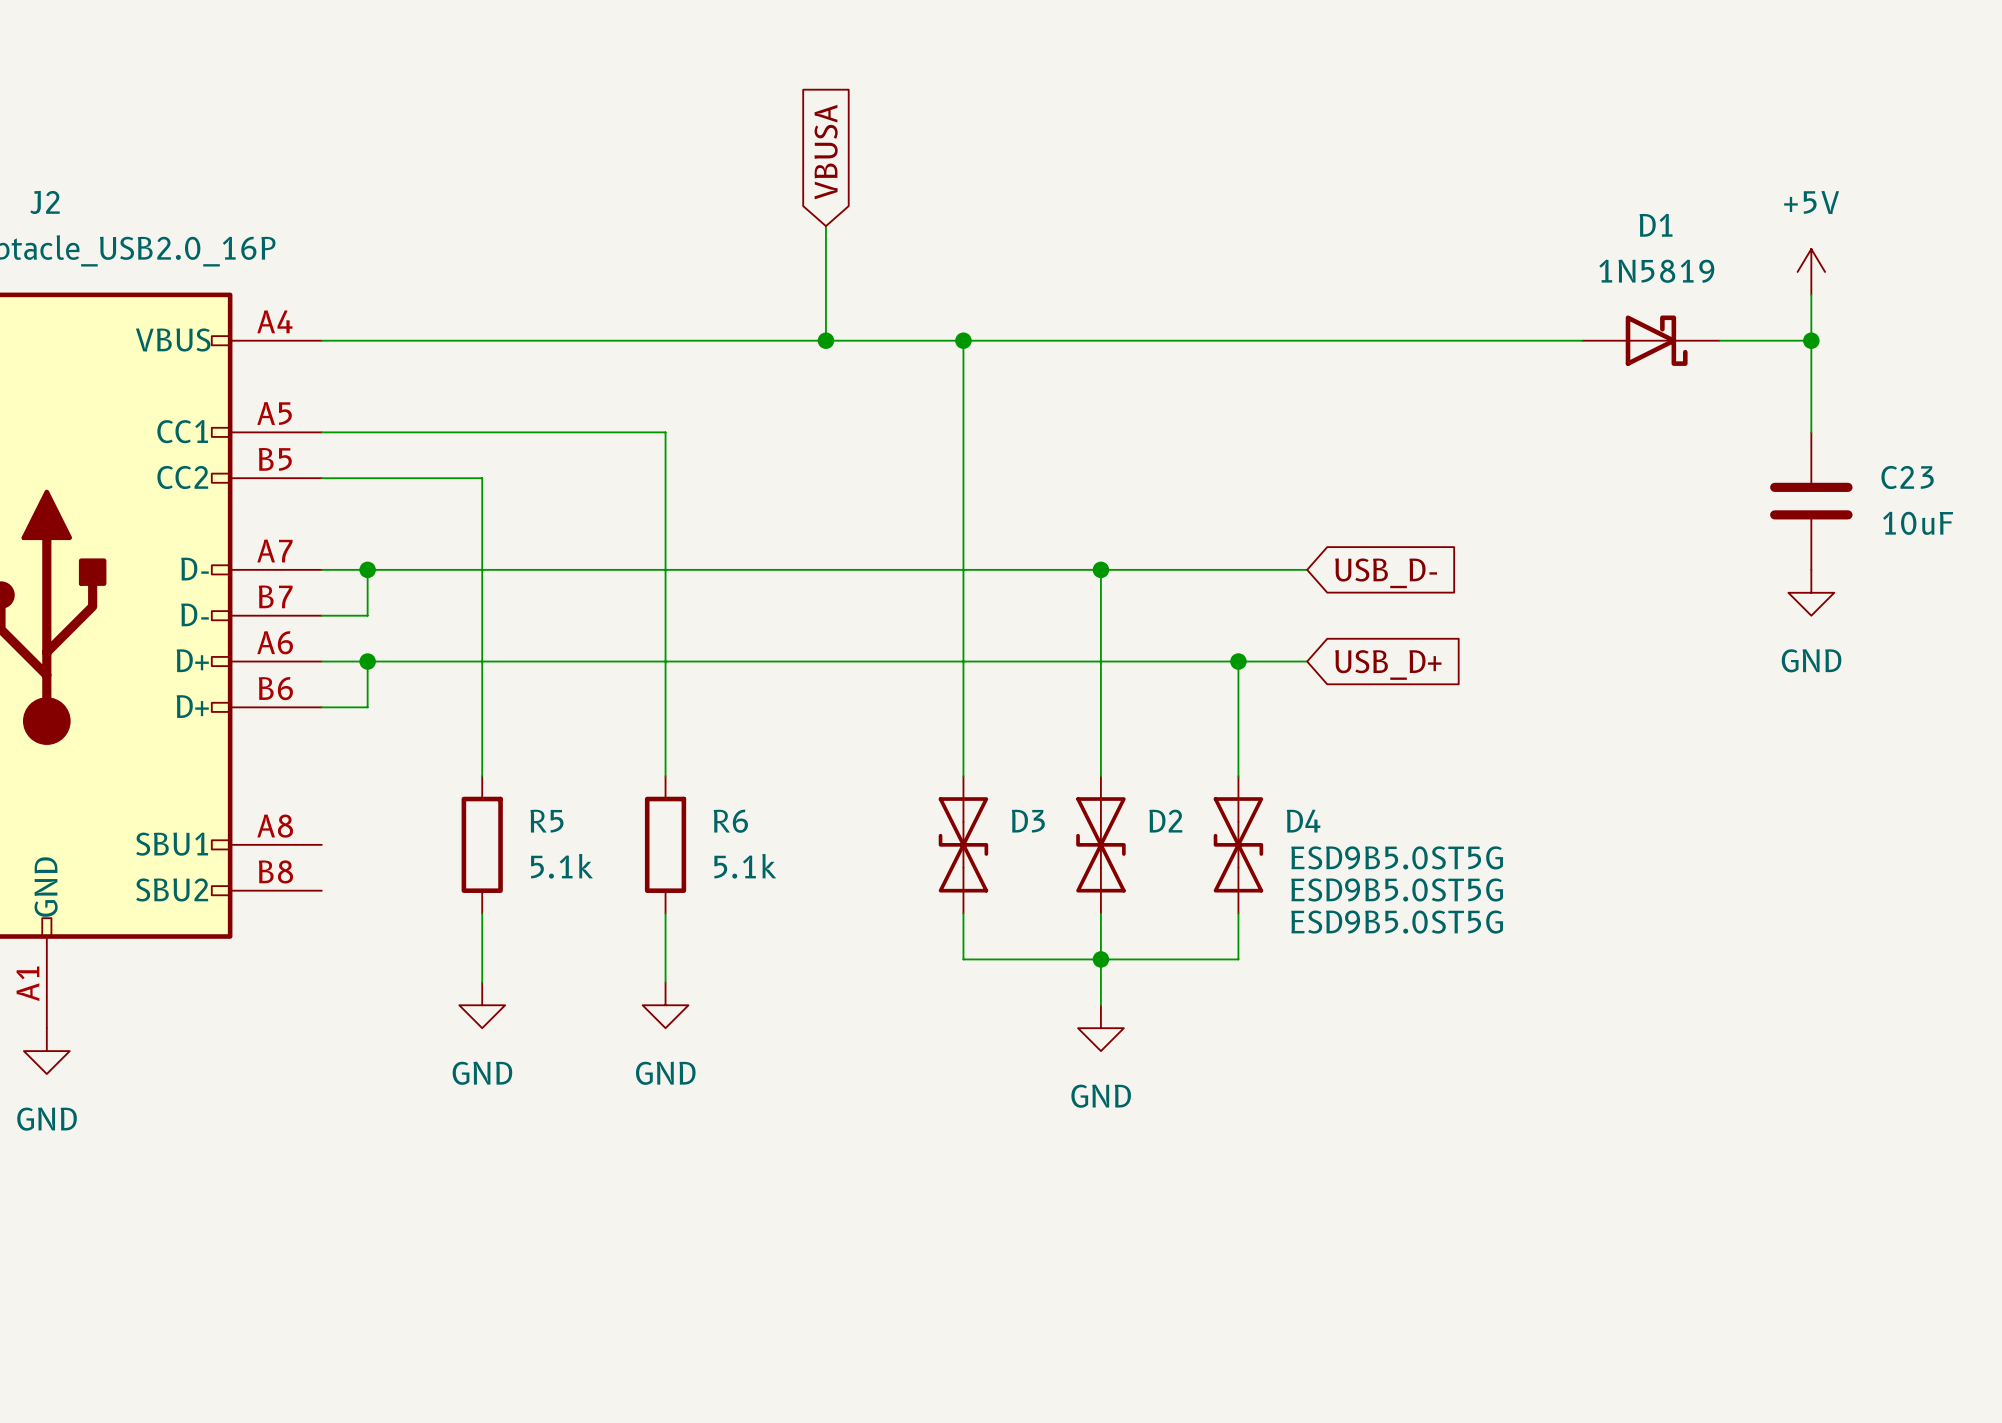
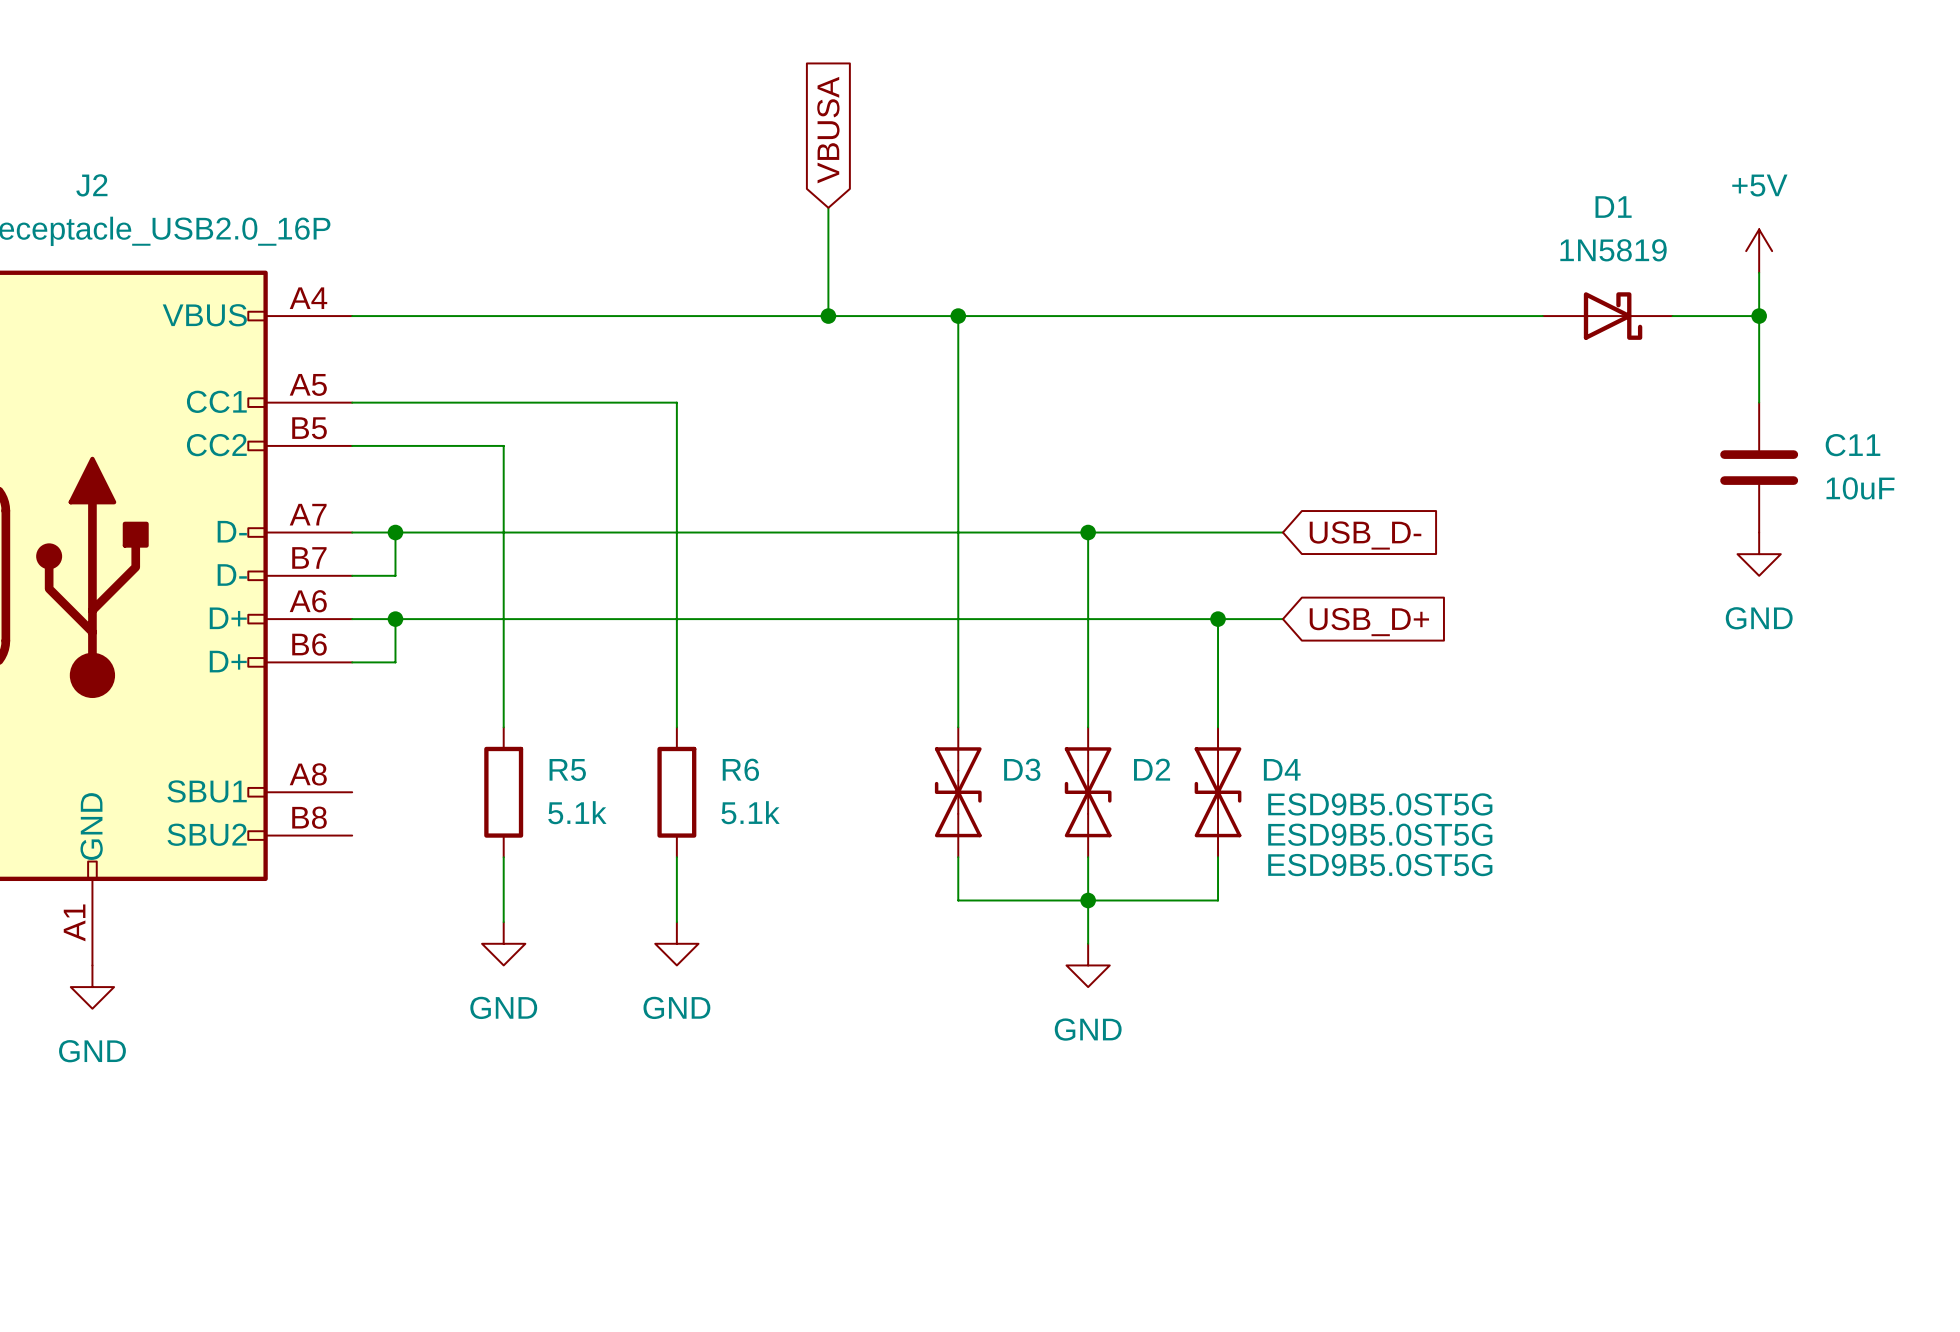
C23 name: C23 (1907, 477) -> C11 (1852, 445)

